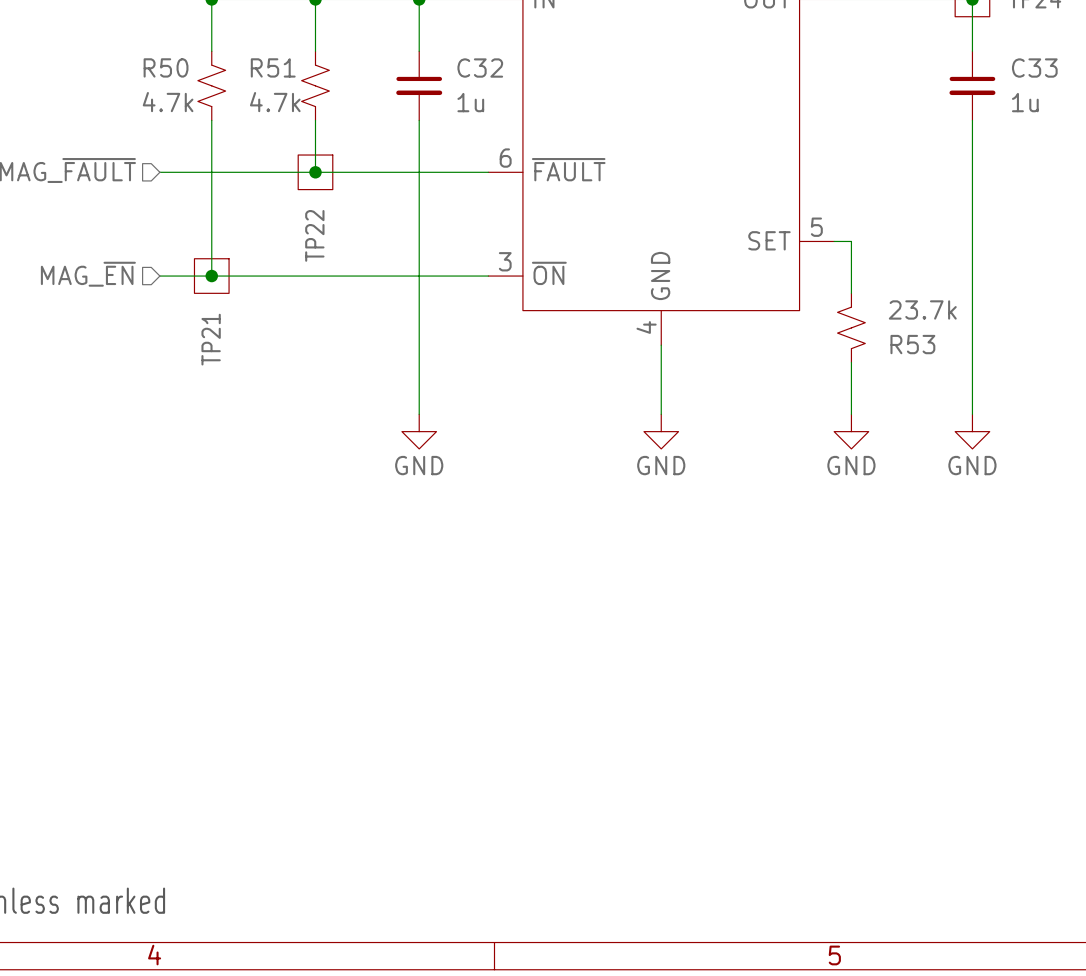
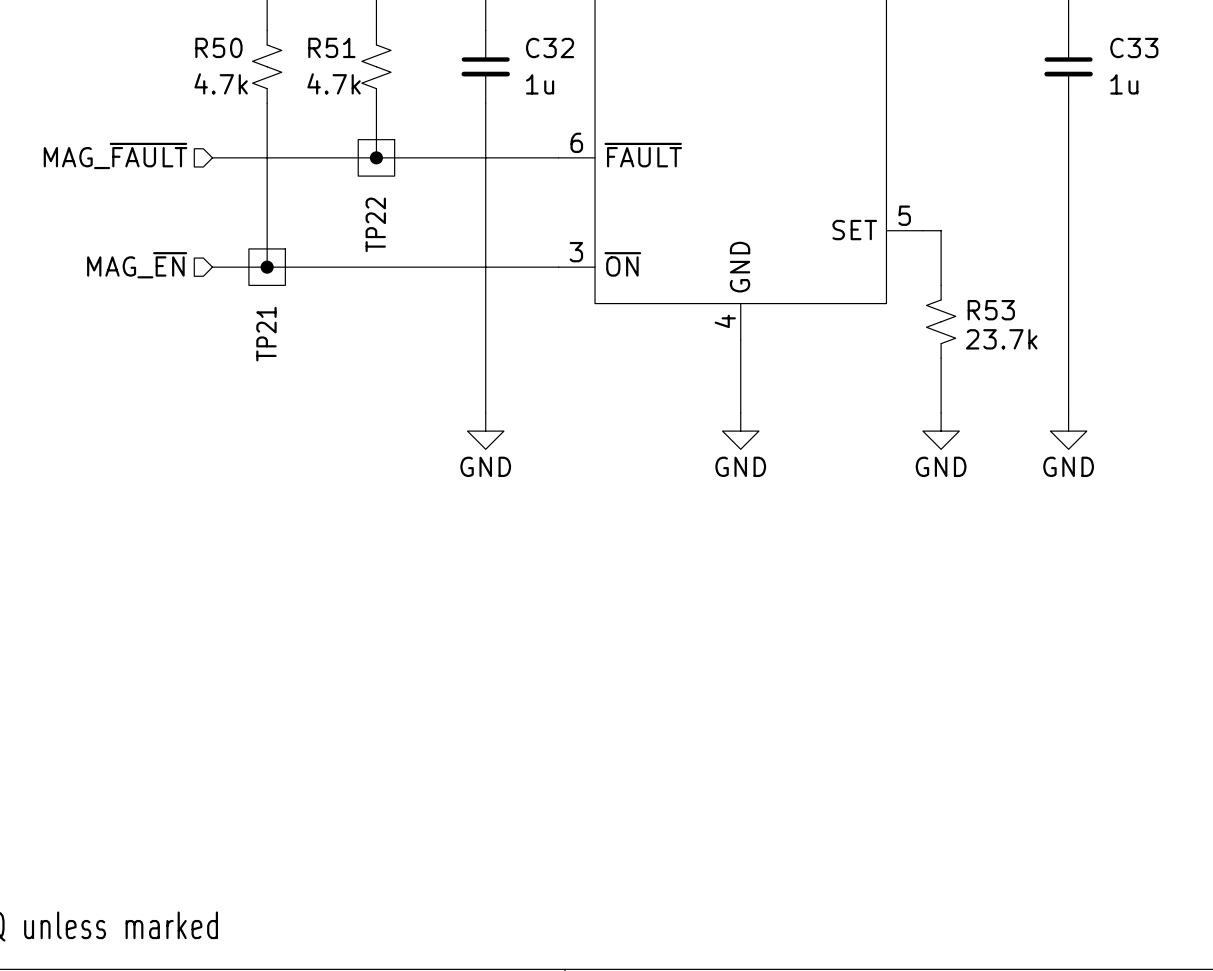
R53 value position: 23.7k (922, 309) -> 23.7k (1001, 339)
R53 name position: R53 (912, 344) -> R53 (991, 310)

